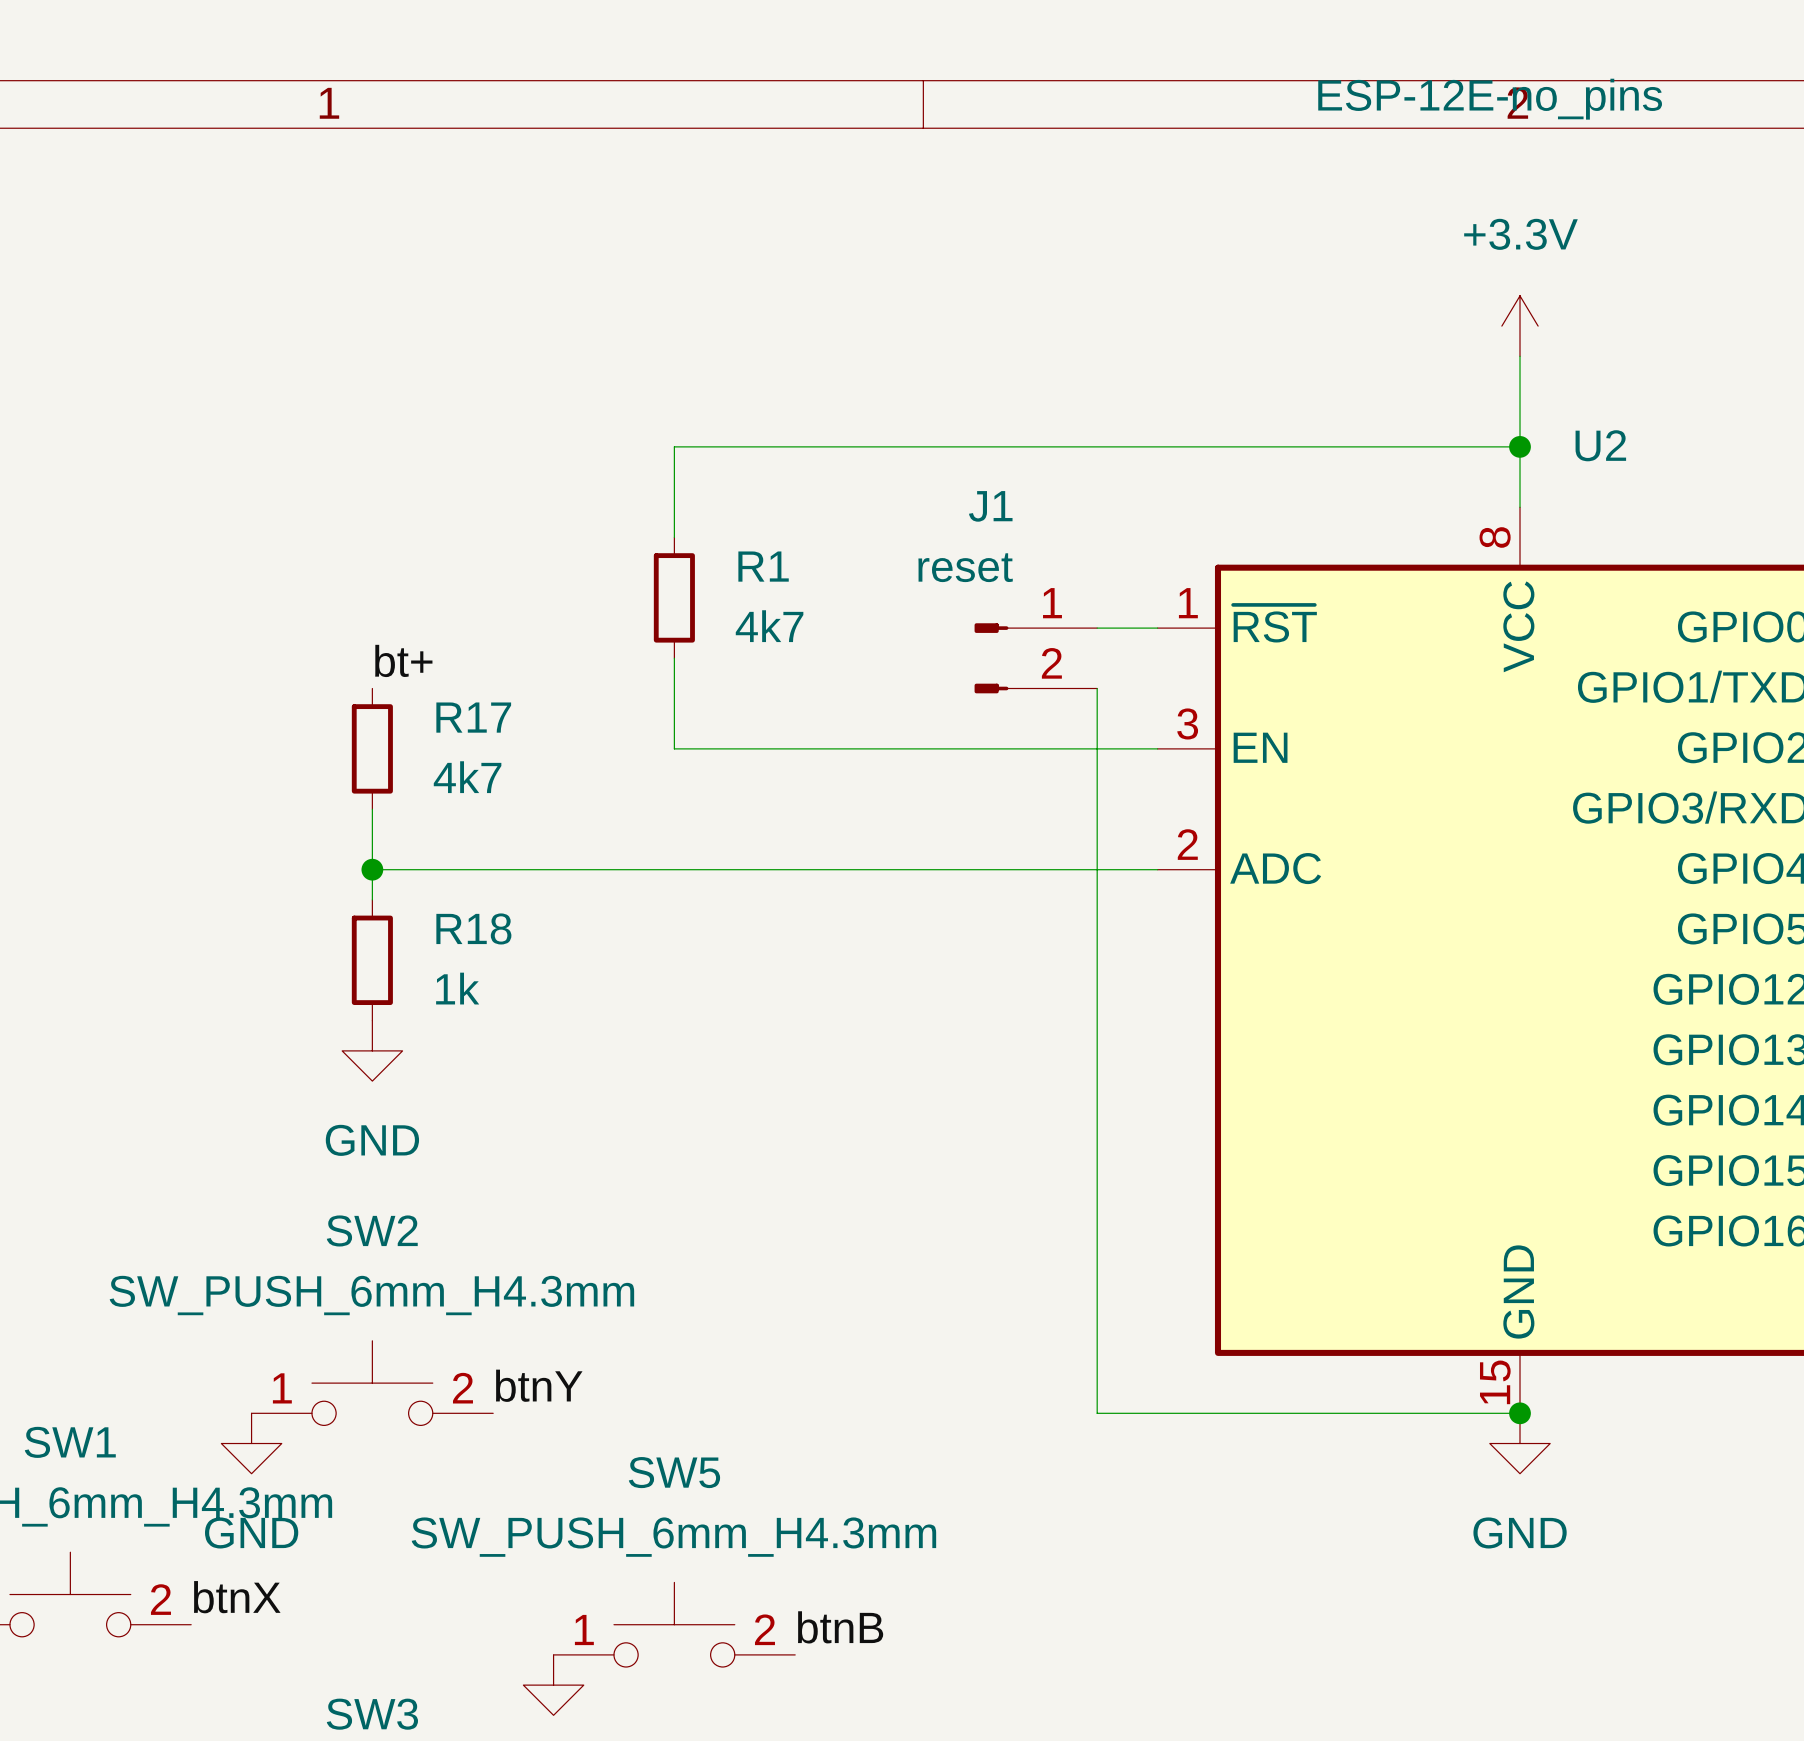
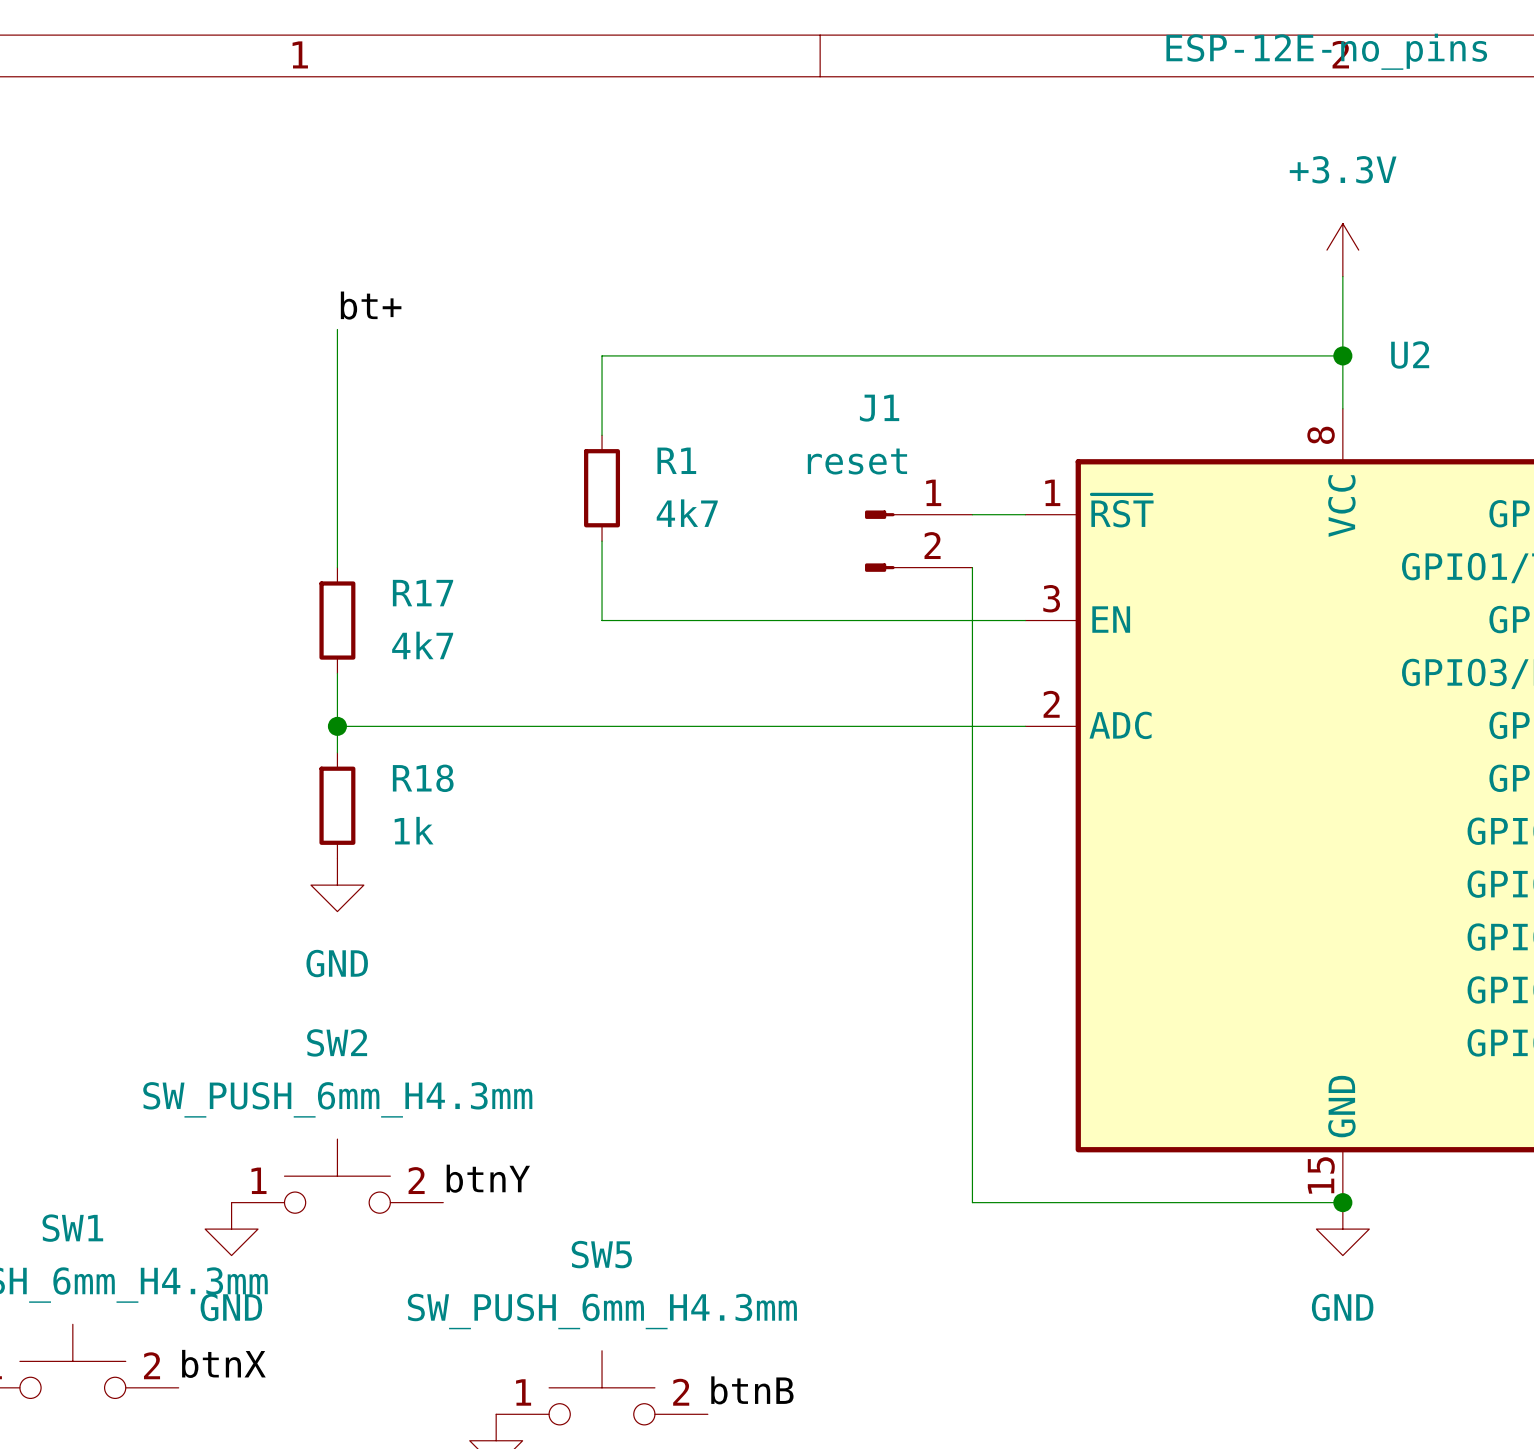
wire: none -> (337, 329) (337, 567)
label position: bt+ (403, 660) -> bt+ (371, 305)

